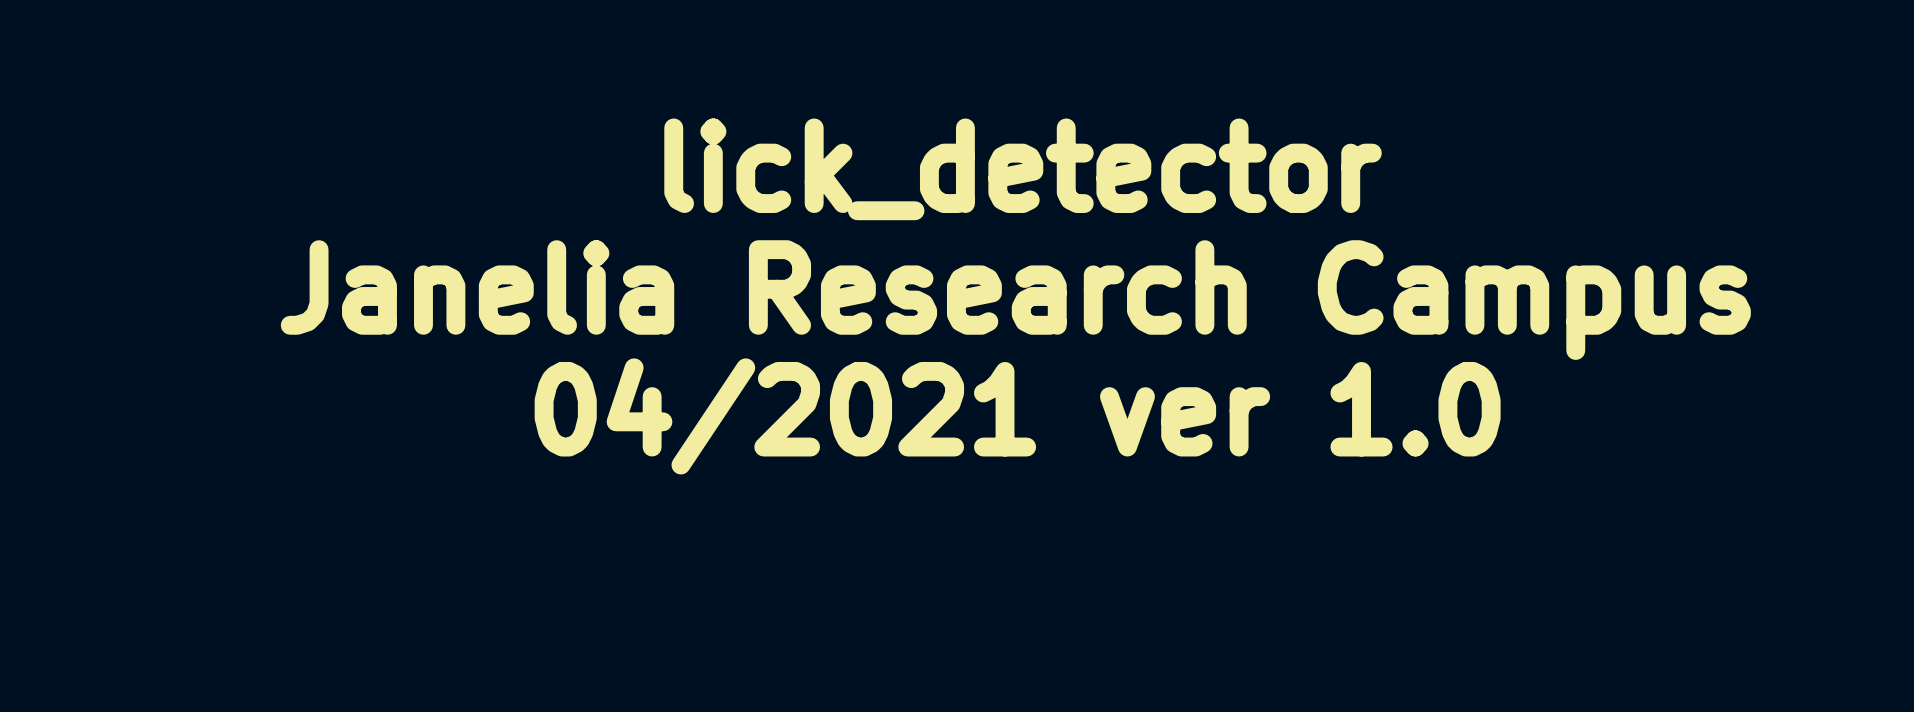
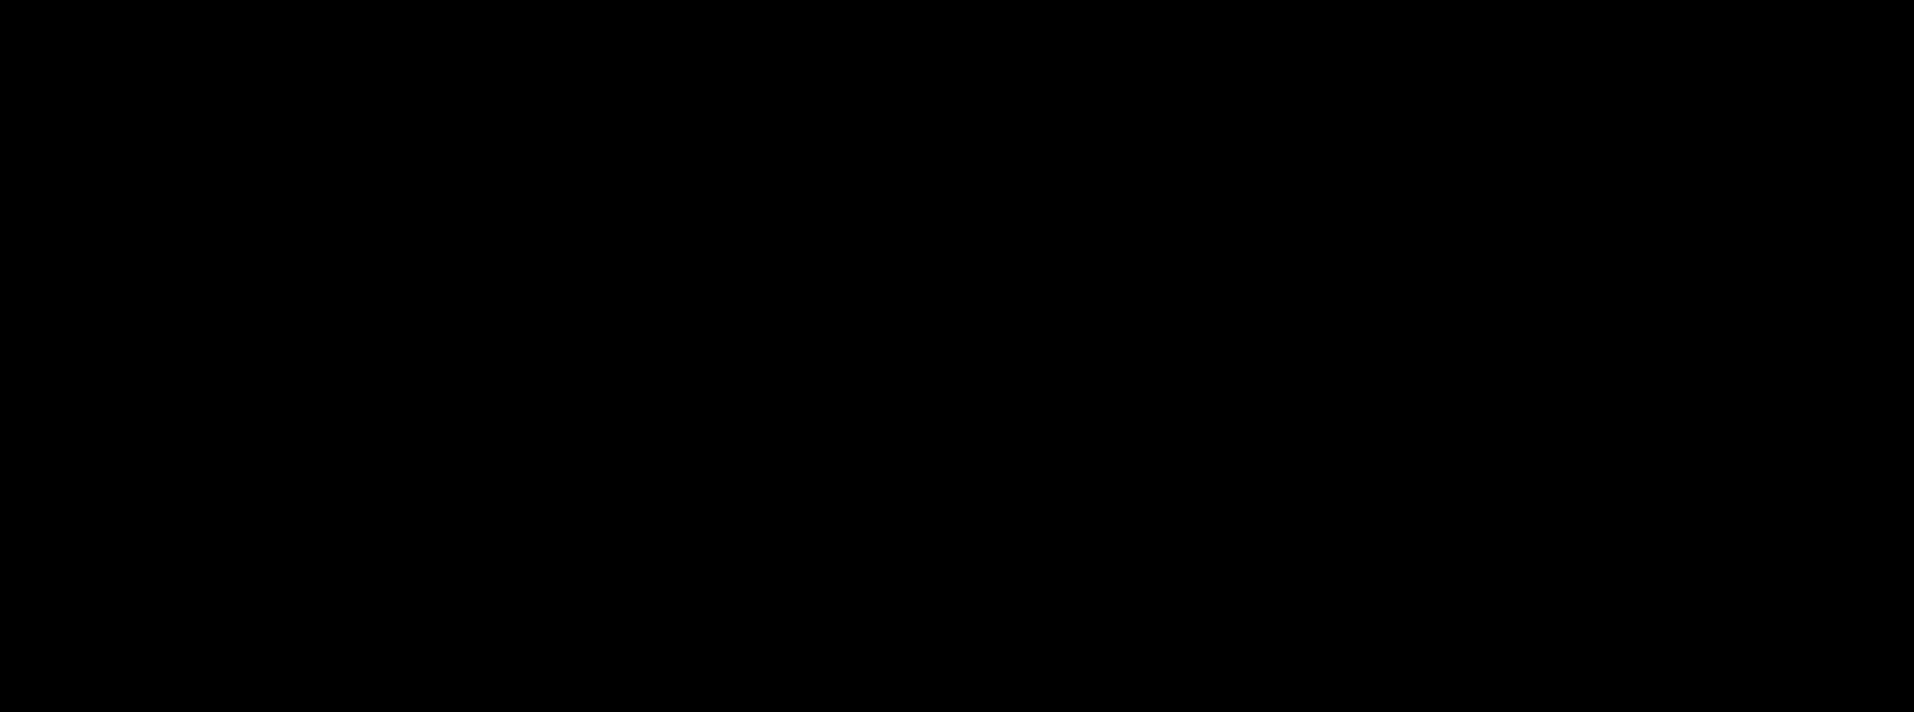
text: lick_detector (1023, 169) -> none
text: Janelia Research Campus (1015, 300) -> none
text: 04/2021 ver 1.0 (1017, 416) -> none

